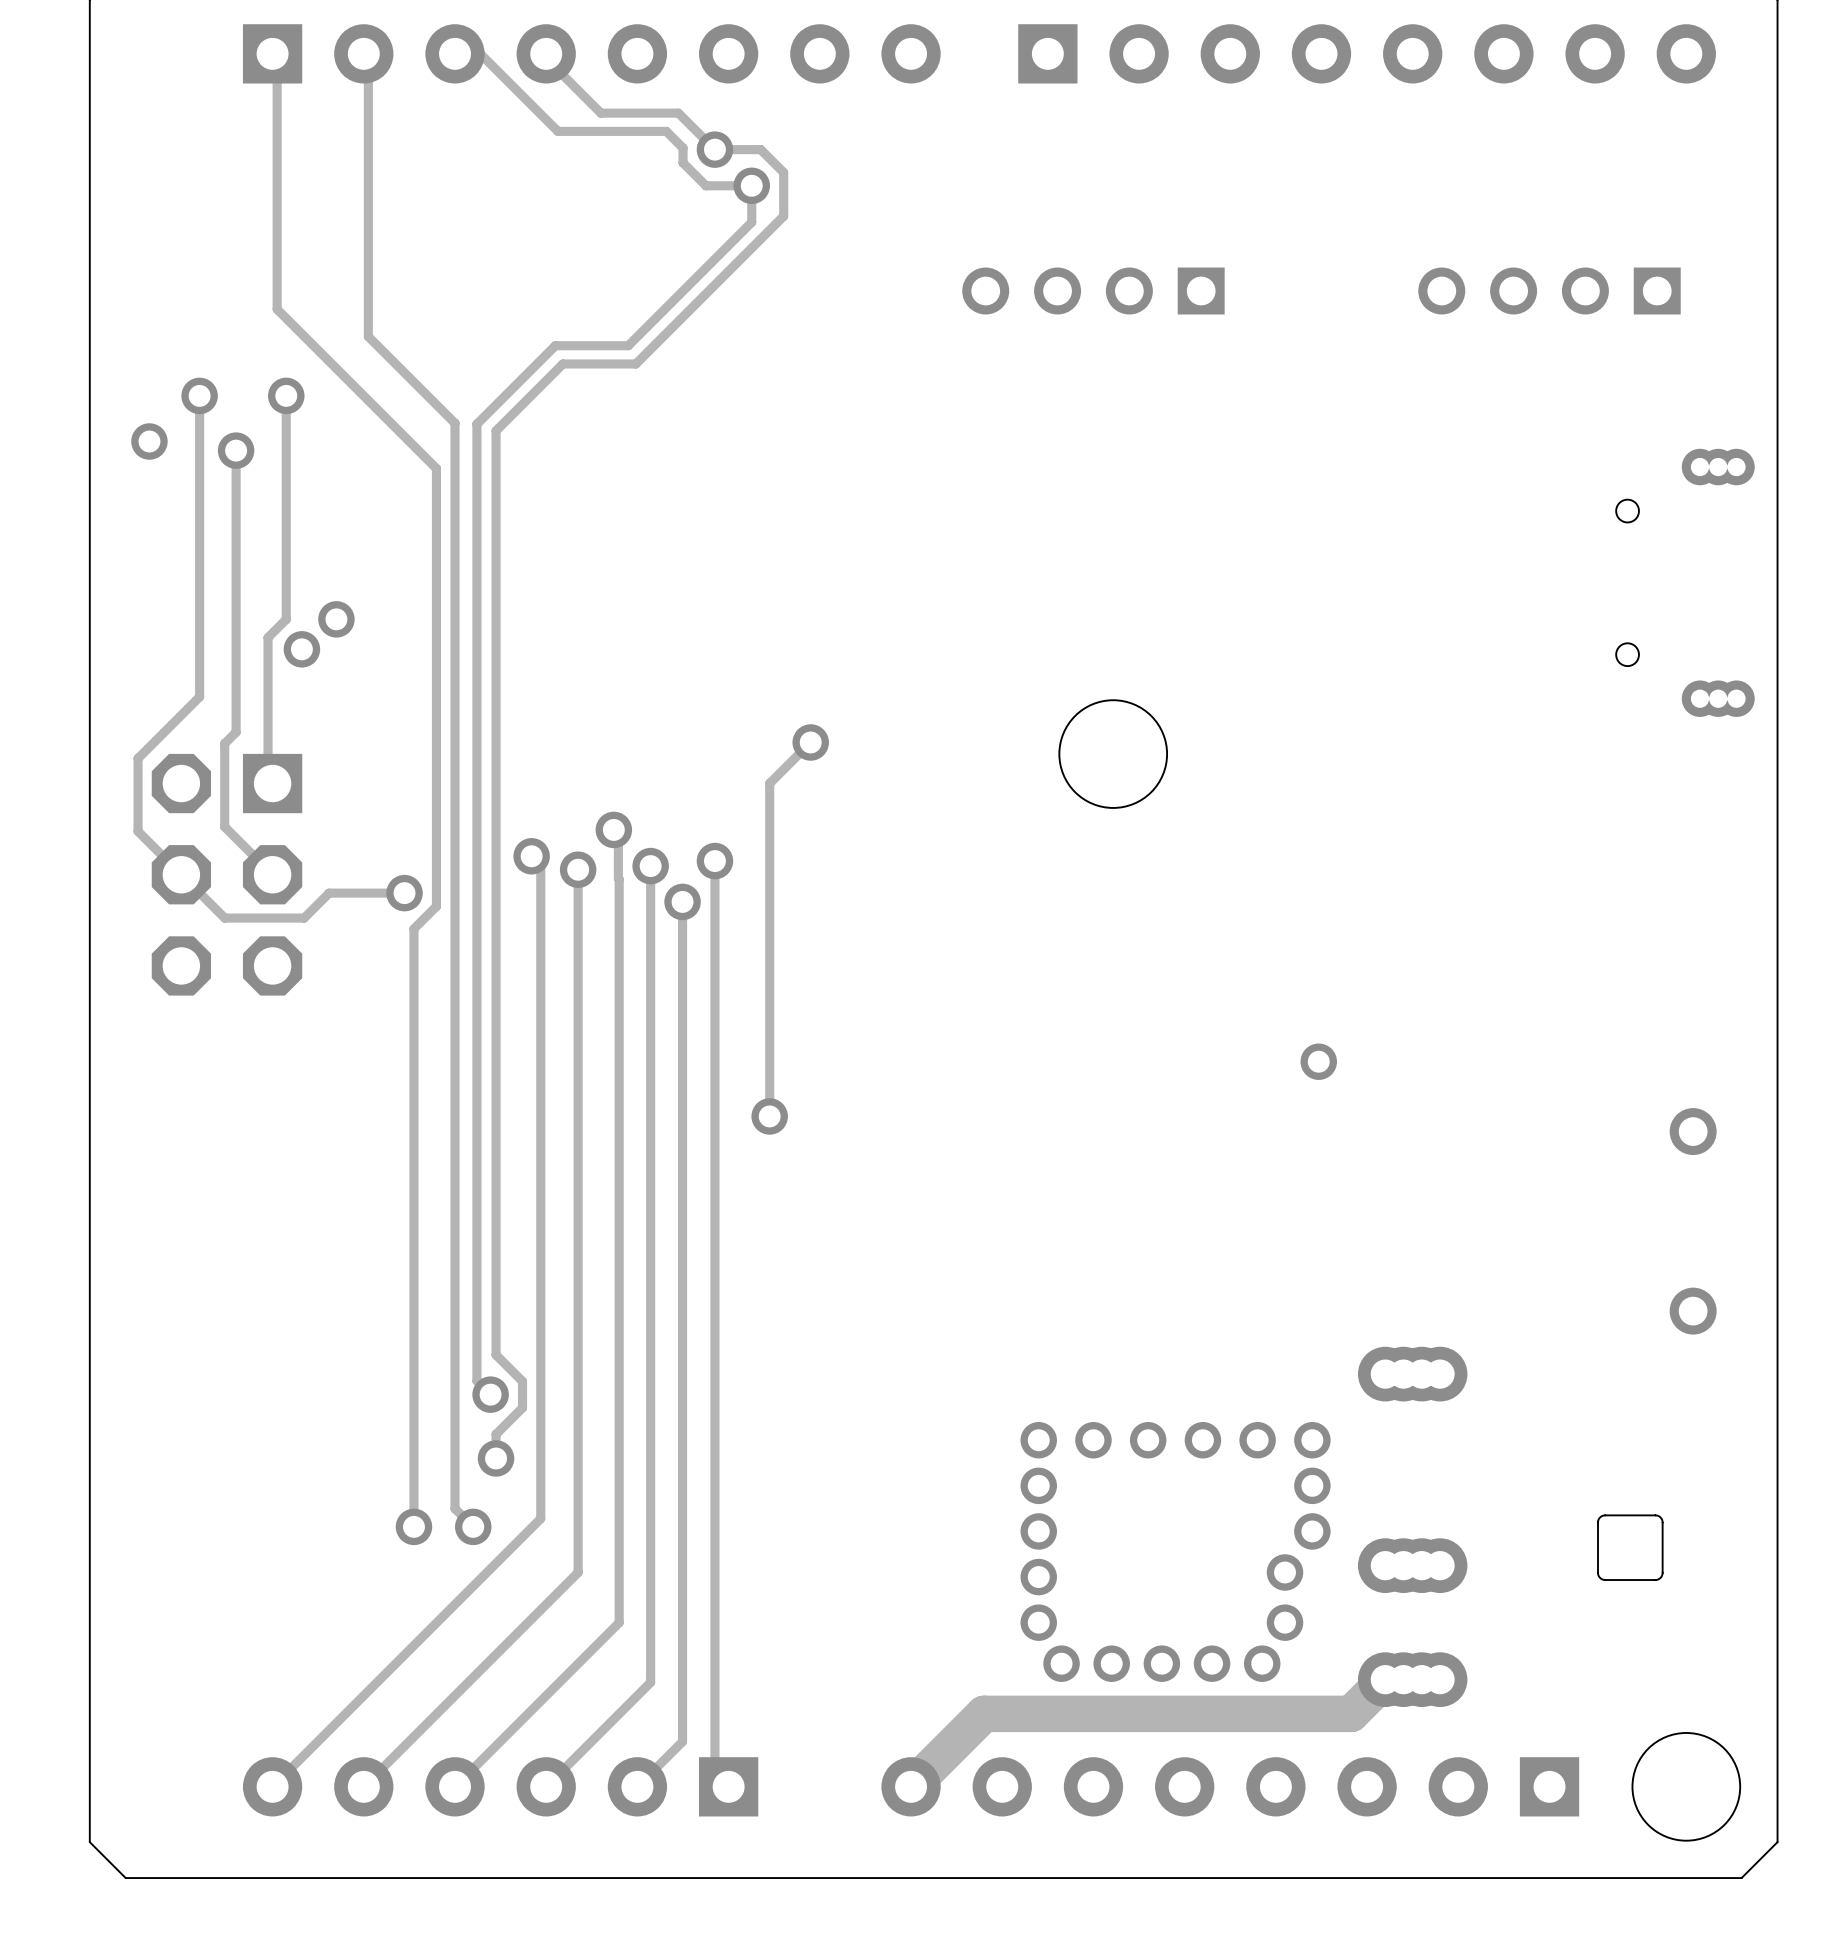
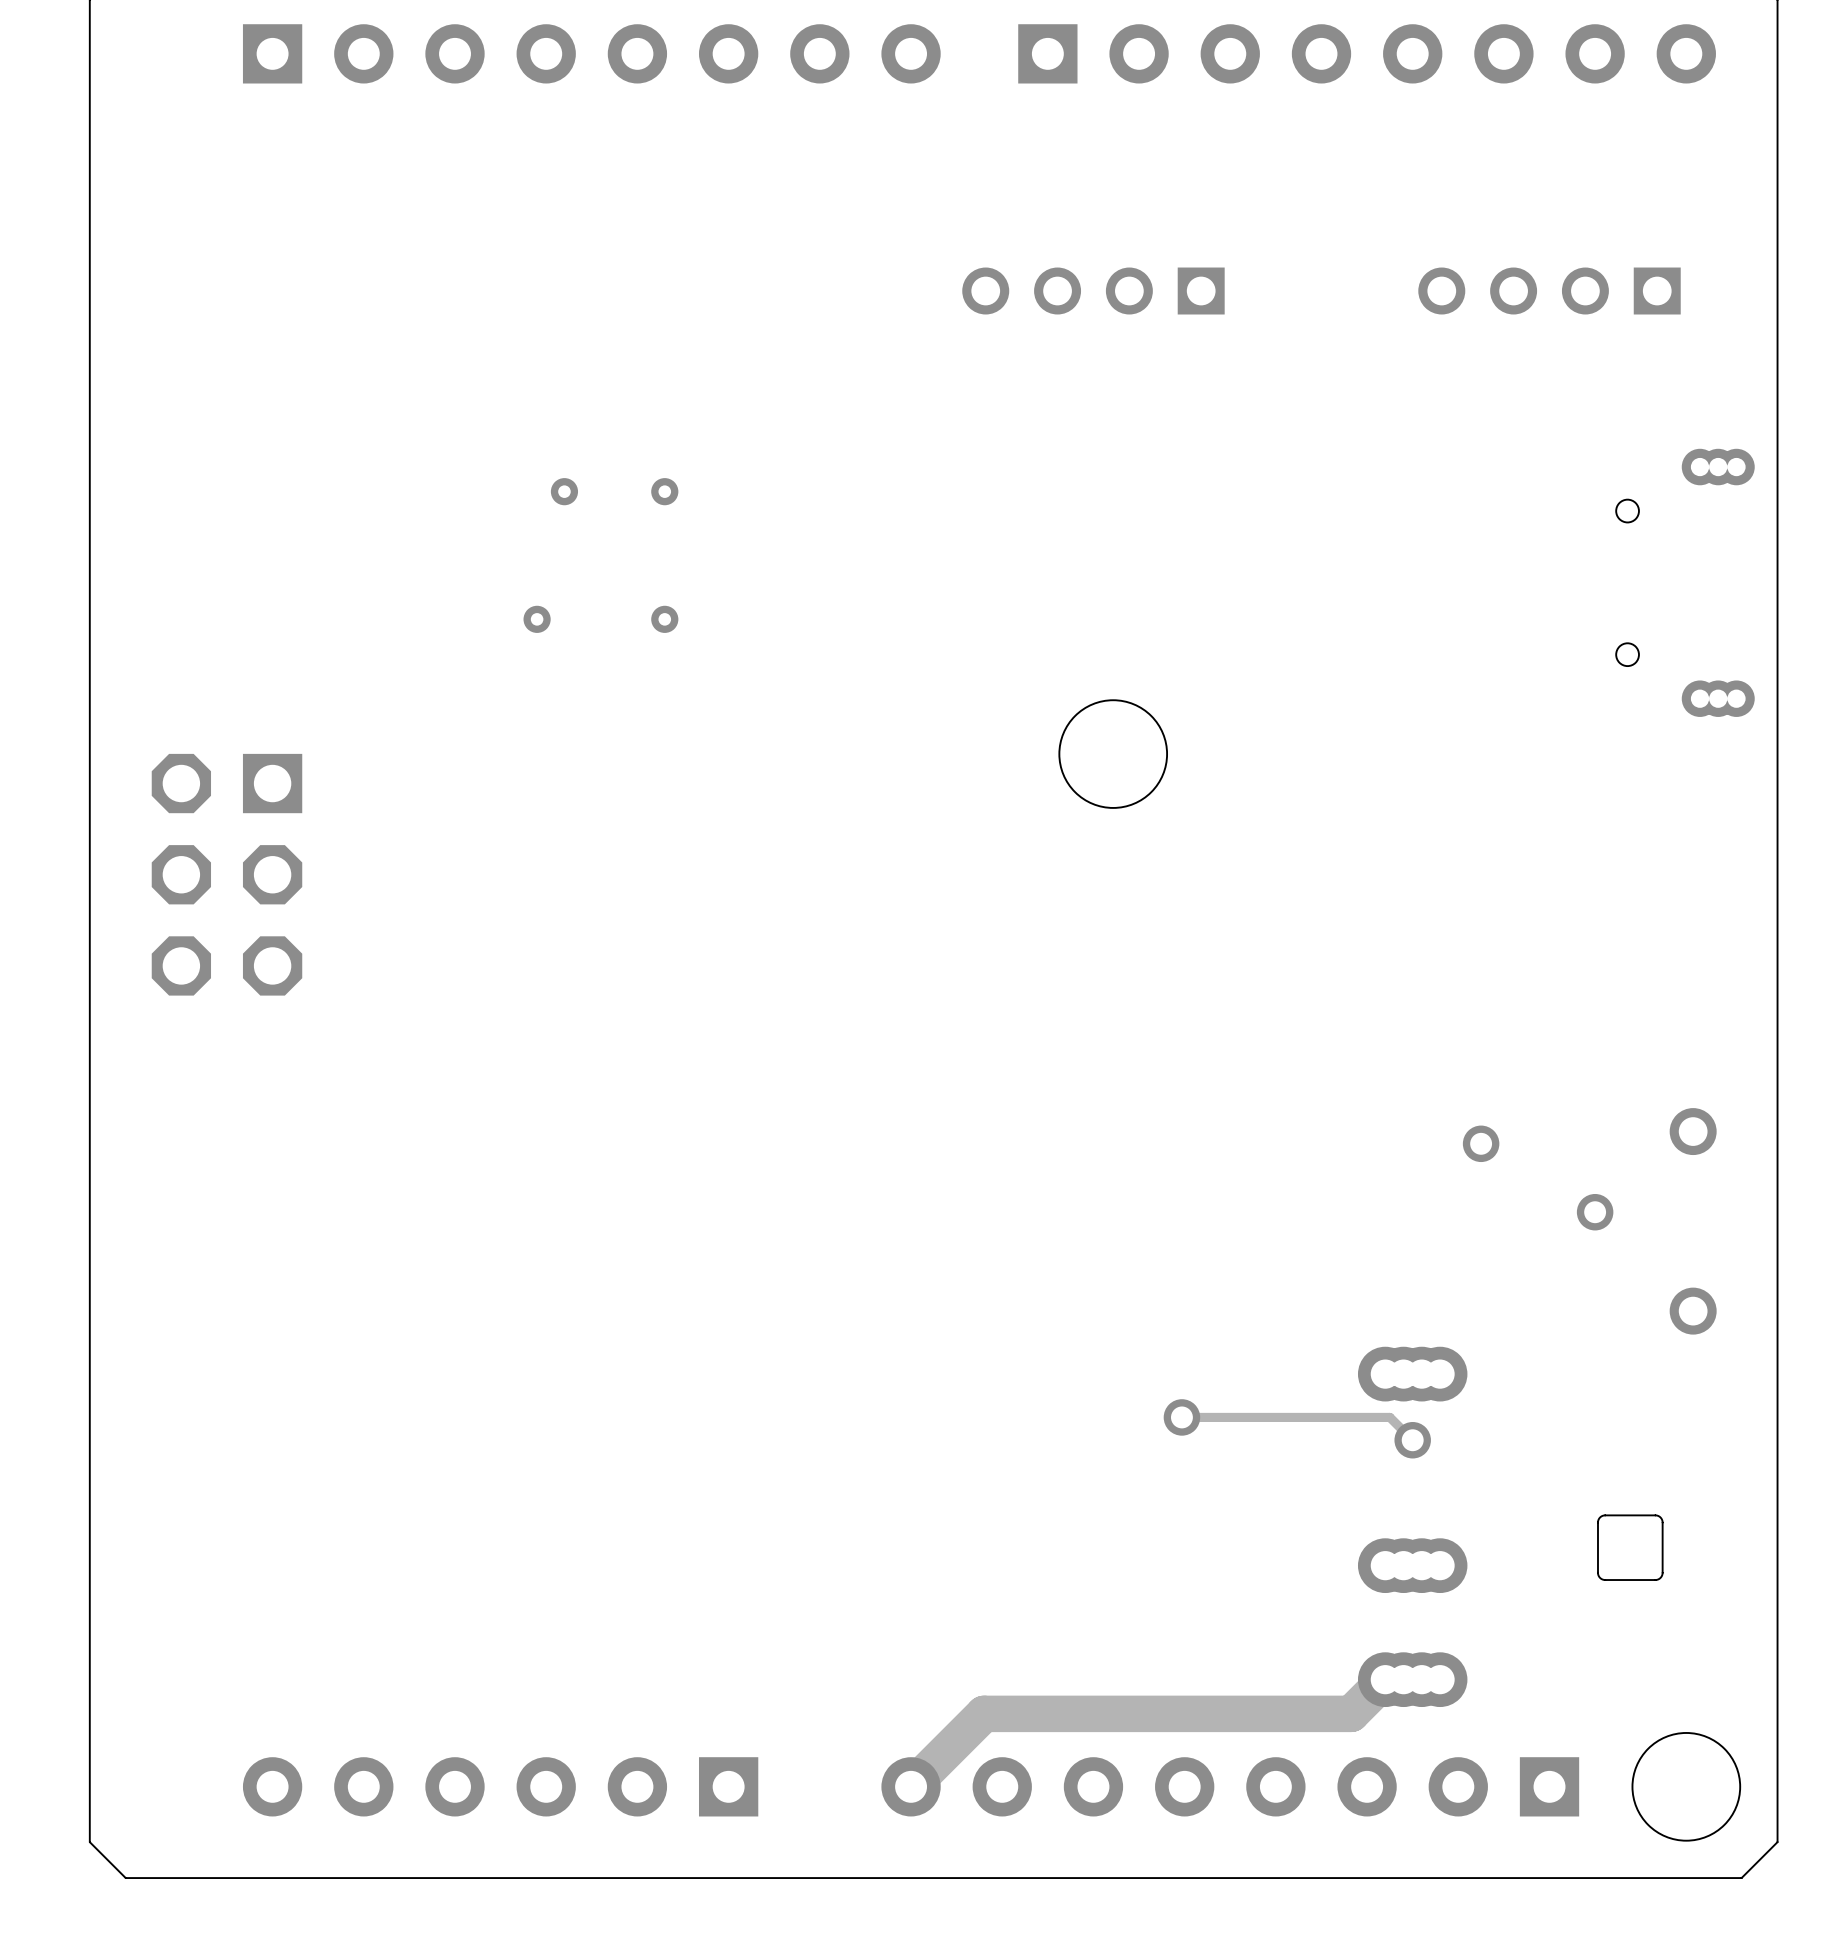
track: (272, 53) (277, 58) (277, 309) (436, 468) (436, 906) (413, 928) (413, 1526) -> none
track: (363, 53) (368, 58) (368, 336) (455, 423) (455, 1508) (473, 1526) -> none
track: (455, 53) (480, 53) (557, 131) (666, 131) (683, 148) (683, 162) (705, 185) (751, 185) (751, 222) (628, 345) (555, 345) (476, 424) (476, 1380) (490, 1394) -> none
track: (546, 53) (546, 58) (600, 113) (678, 113) (714, 149) (760, 149) (783, 172) (783, 216) (635, 363) (562, 363) (496, 430) (496, 1354) (522, 1381) (522, 1407) (496, 1434) (496, 1458) -> none
via: (714, 149) -> none
via: (751, 185) -> none
track: (199, 395) (199, 696) (138, 758) (138, 831) (224, 918) (304, 918) (329, 893) (404, 893) -> none
via: (199, 395) -> none
track: (286, 395) (286, 619) (268, 637) (268, 778) (272, 783) -> none
via: (286, 395) -> none
via: (149, 441) -> none
track: (236, 450) (236, 732) (224, 743) (224, 826) (272, 874) -> none
via: (236, 450) -> none
via: none -> (564, 491)
via: none -> (664, 491)
via: (336, 619) -> none
via: none -> (537, 619)
via: none -> (664, 619)
via: (301, 649) -> none
track: (810, 742) (769, 783) (769, 1116) -> none
via: (810, 742) -> none
track: (613, 829) (618, 834) (619, 879) (619, 1622) (455, 1786) -> none
via: (613, 829) -> none
track: (531, 856) (540, 865) (540, 1518) (272, 1786) -> none
via: (531, 856) -> none
track: (714, 861) (714, 1773) (728, 1786) -> none
via: (714, 861) -> none
track: (650, 866) (650, 1682) (546, 1786) -> none
via: (650, 866) -> none
track: (578, 869) (578, 1572) (363, 1786) -> none
via: (578, 869) -> none
via: (404, 893) -> none
track: (682, 901) (682, 1741) (637, 1786) -> none
via: (682, 901) -> none
via: (1318, 1061) -> none
via: (769, 1116) -> none
via: none -> (1481, 1143)
via: none -> (1595, 1212)
via: (490, 1394) -> none
track: none -> (1181, 1417) (1389, 1417) (1412, 1440)
via: none -> (1181, 1417)
via: (1038, 1440) -> none
via: (1093, 1440) -> none
via: (1148, 1440) -> none
via: (1202, 1440) -> none
via: (1257, 1440) -> none
via: (1312, 1440) -> none
via: none -> (1412, 1440)
via: (496, 1458) -> none
via: (1038, 1485) -> none
via: (1312, 1485) -> none
via: (413, 1526) -> none
via: (473, 1526) -> none
via: (1038, 1531) -> none
via: (1312, 1531) -> none
via: (1285, 1572) -> none
via: (1038, 1577) -> none
via: (1038, 1622) -> none
via: (1285, 1622) -> none
via: (1061, 1663) -> none
via: (1111, 1663) -> none
via: (1161, 1663) -> none
via: (1212, 1663) -> none
via: (1262, 1663) -> none

